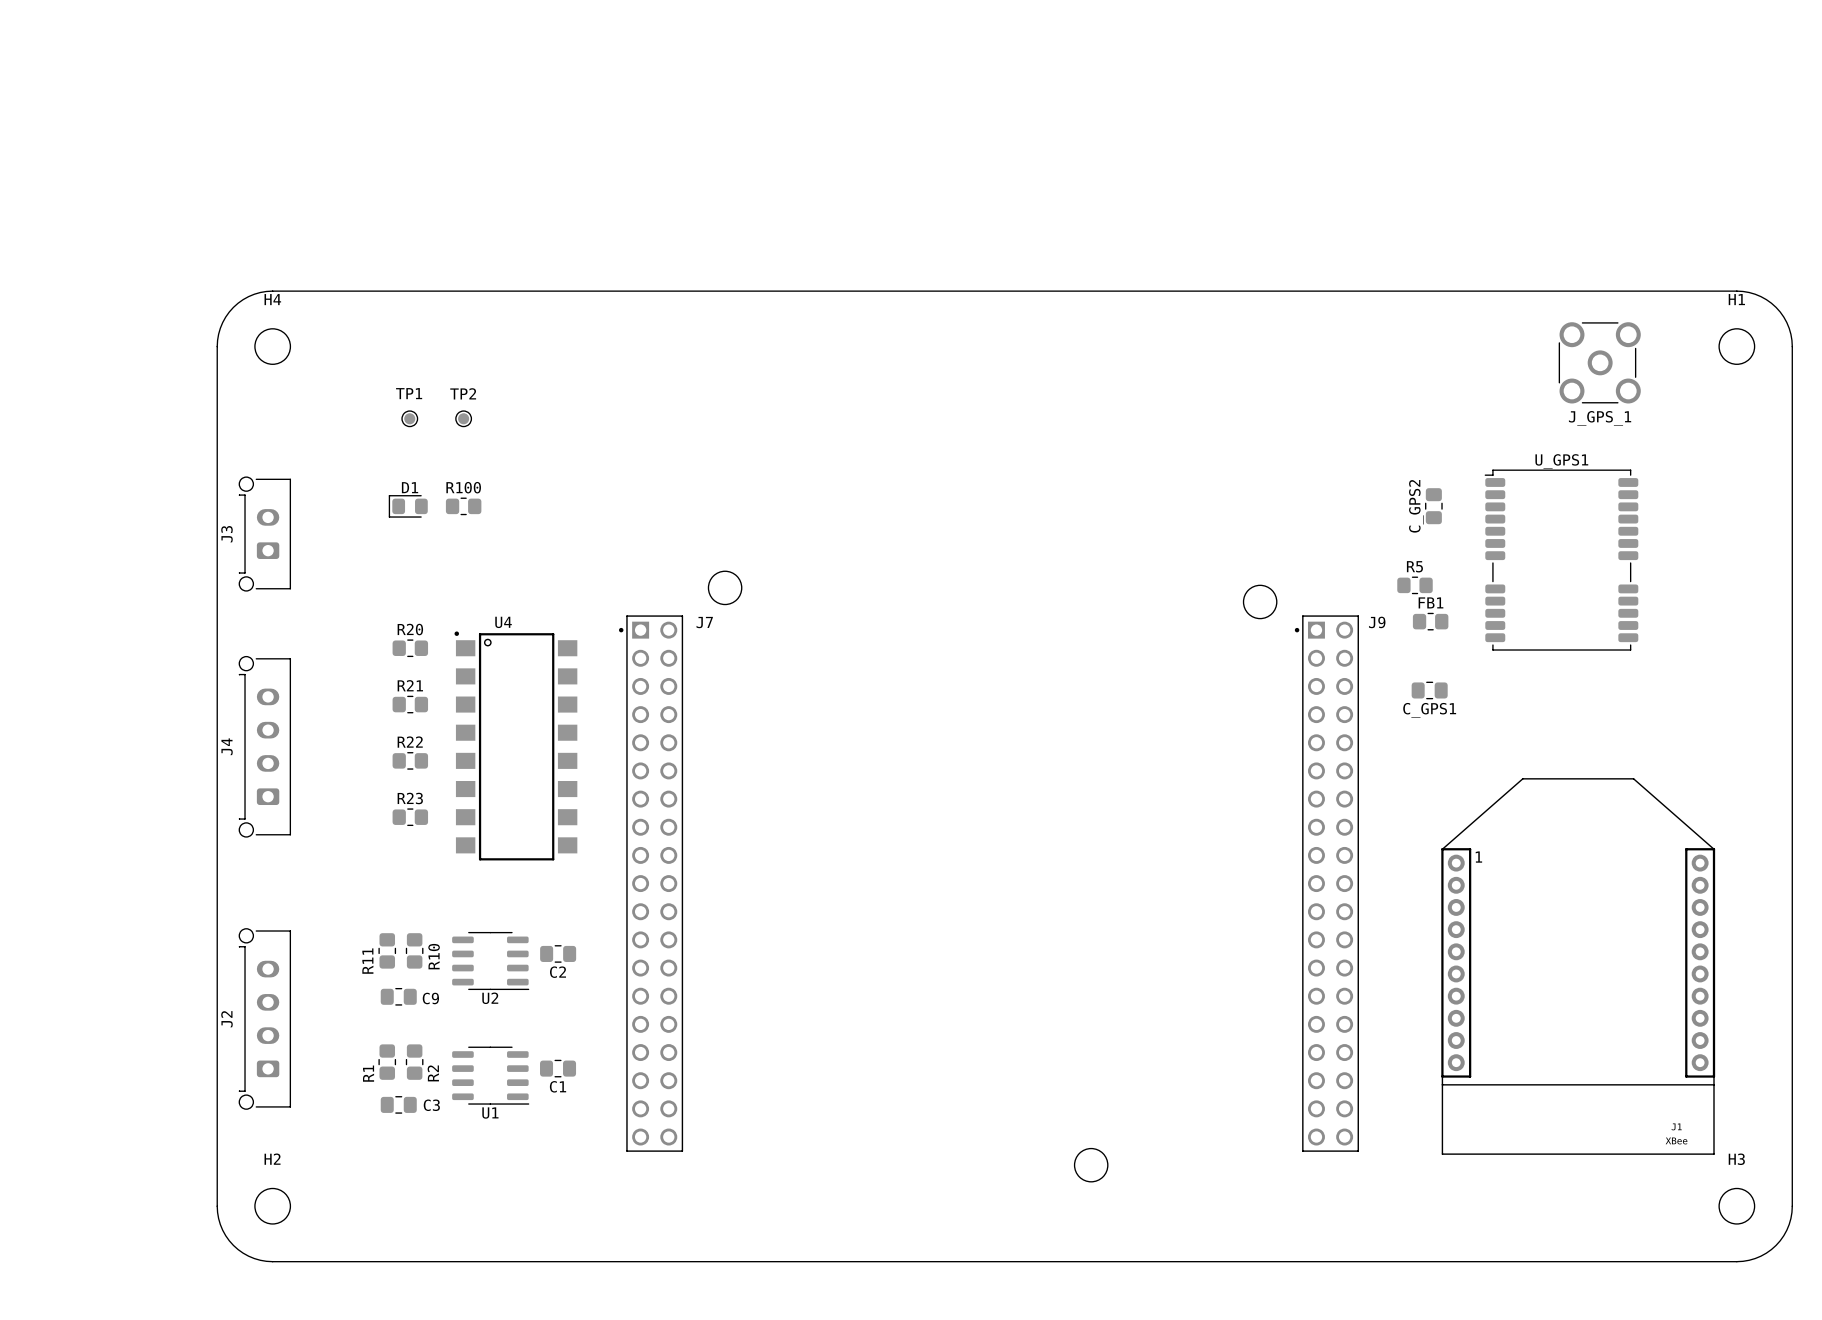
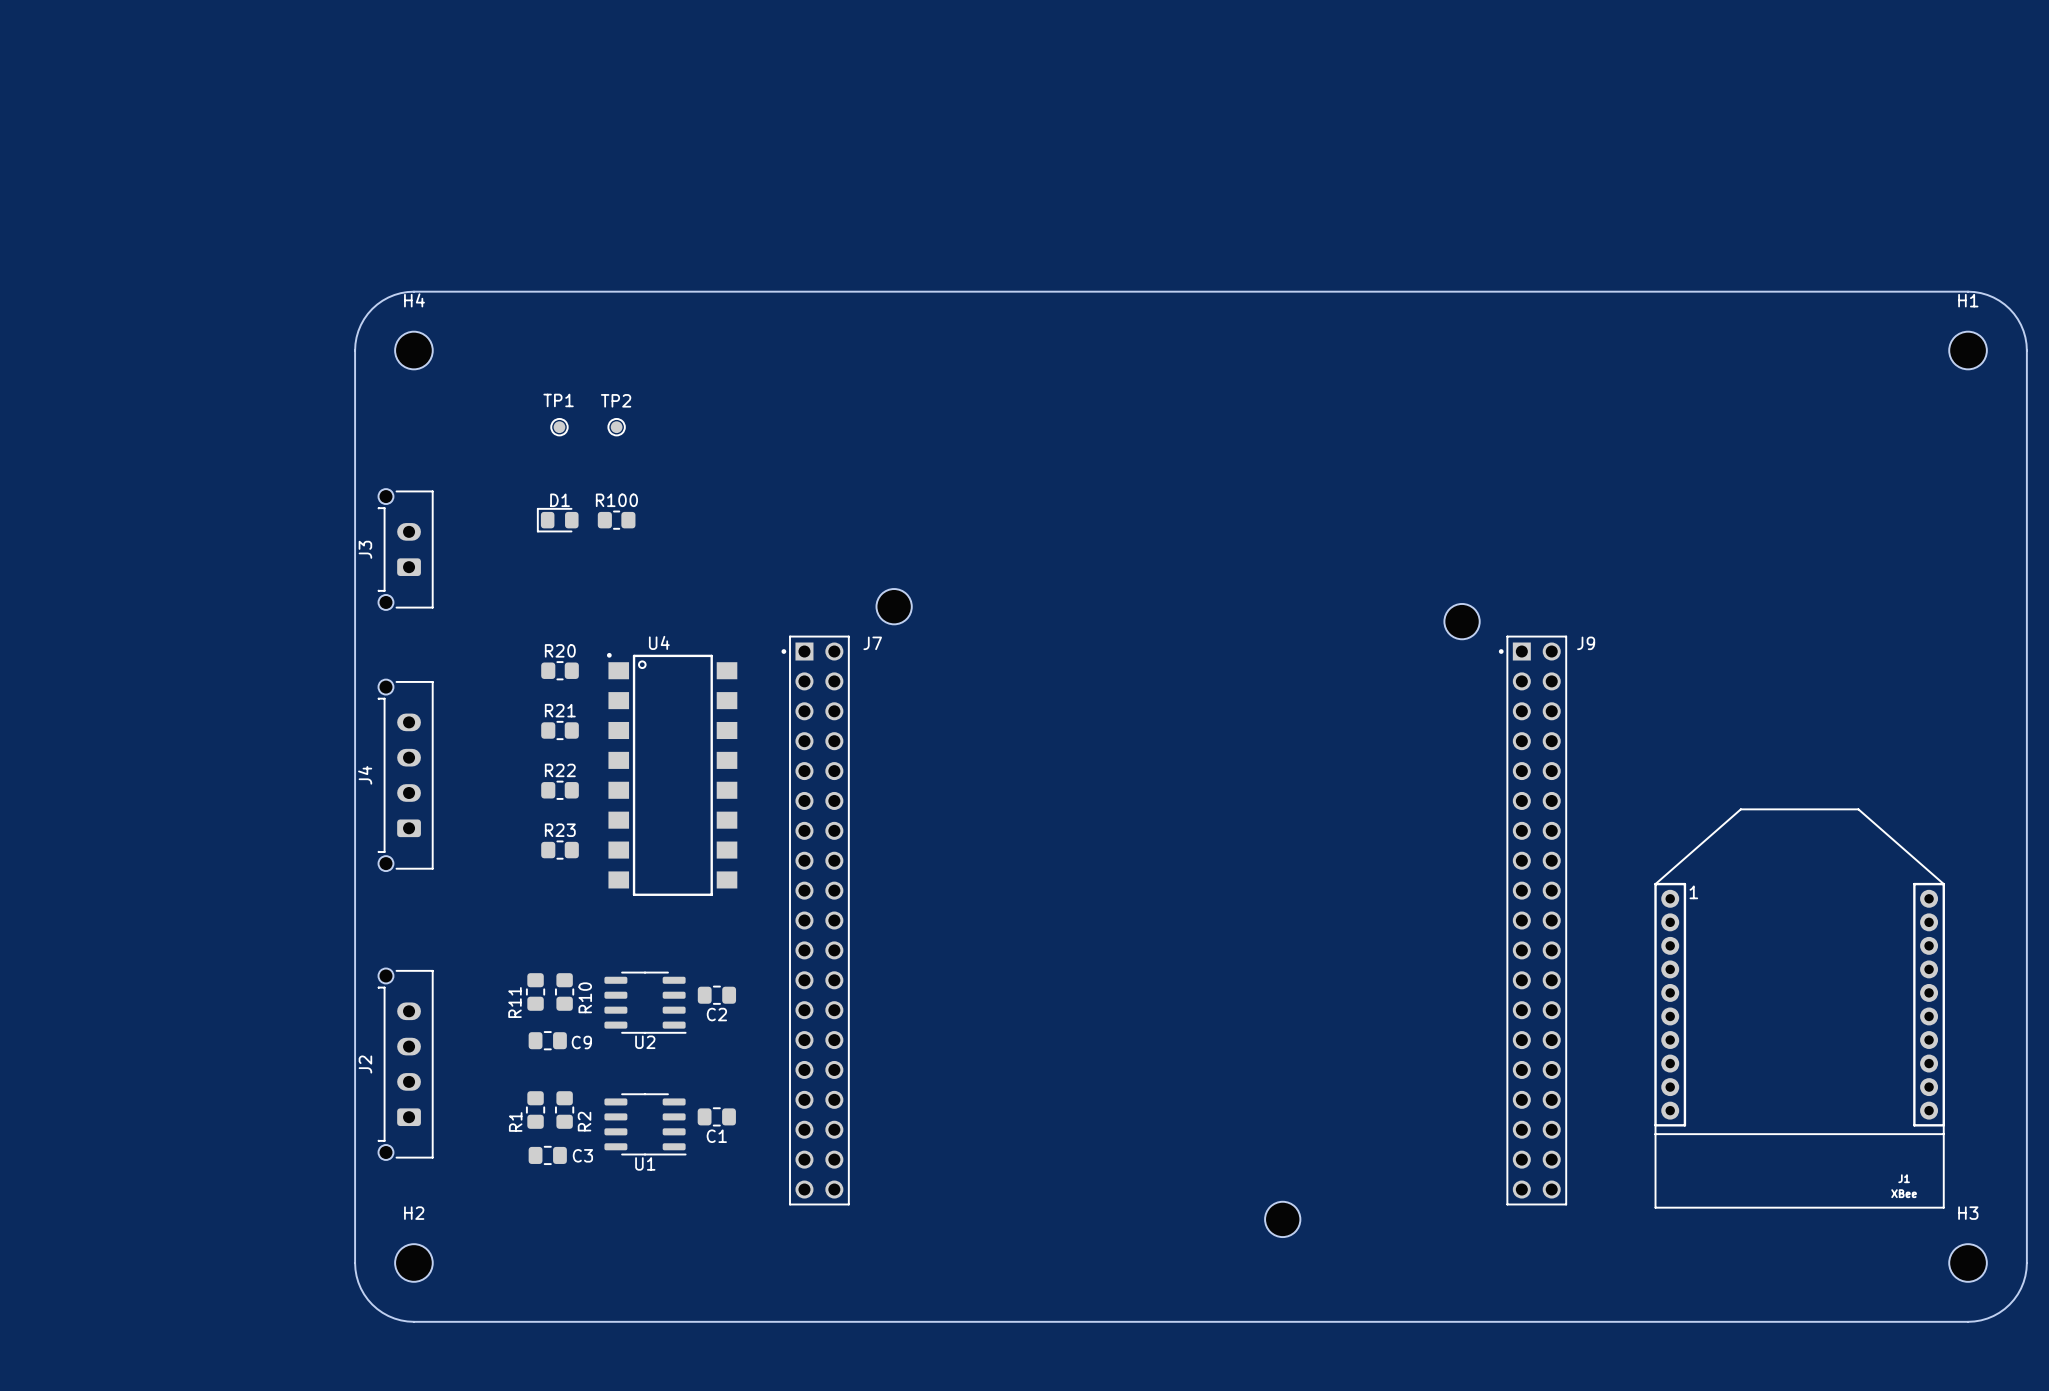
J_GPS_1: (1599, 362) -> none
C_GPS2: (1433, 506) -> none
U_GPS1: (1561, 560) -> none
R5: (1415, 585) -> none
FB1: (1430, 621) -> none
C_GPS1: (1429, 690) -> none

